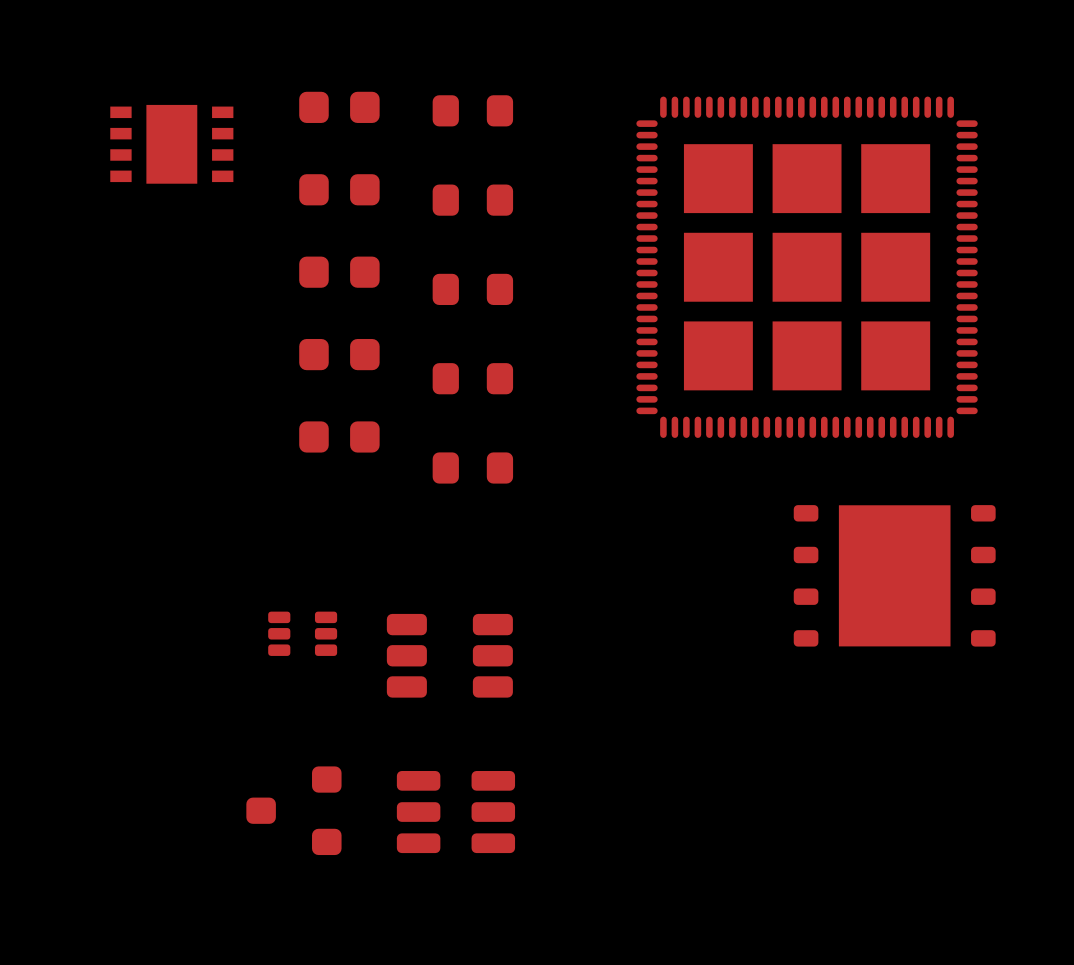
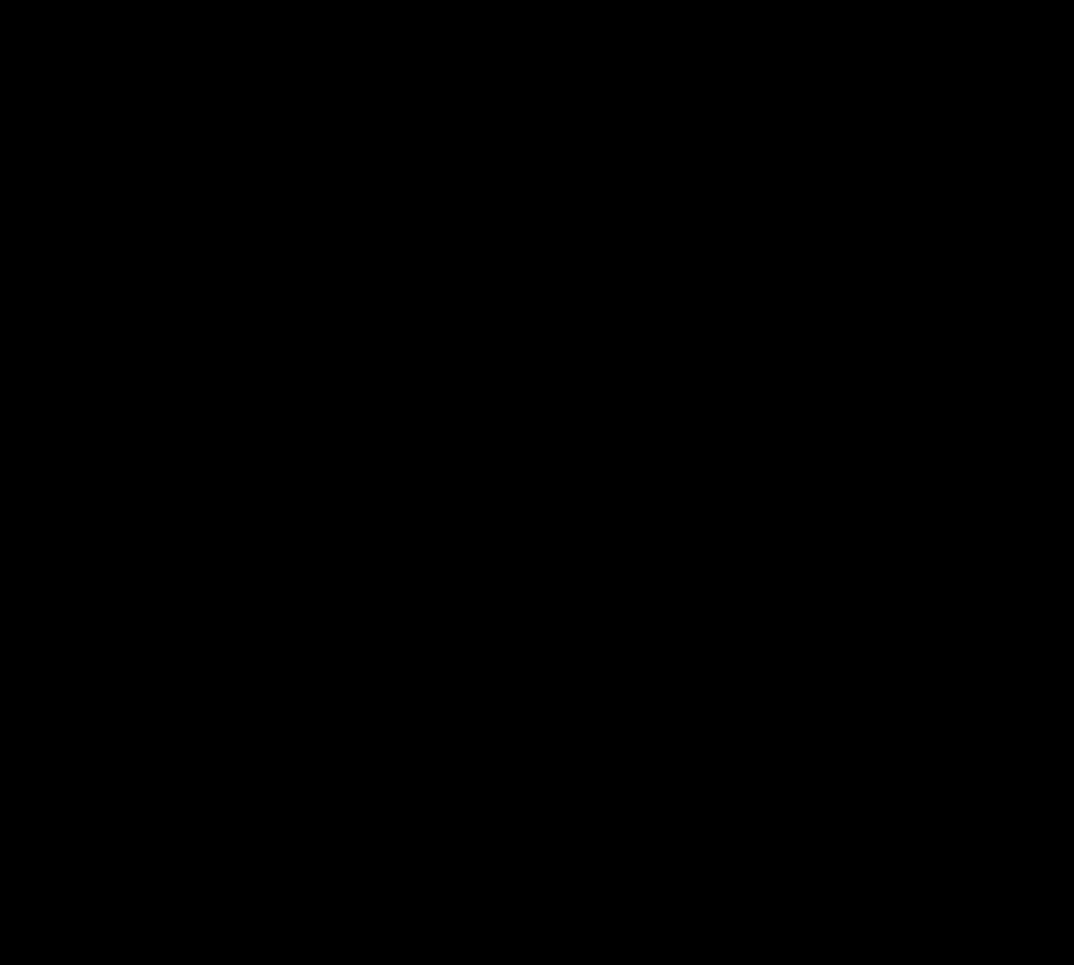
part: (339, 107) -> none
part: (472, 110) -> none
part: (171, 144) -> none
part: (339, 189) -> none
part: (472, 200) -> none
part: (807, 267) -> none
part: (339, 272) -> none
part: (472, 289) -> none
part: (339, 354) -> none
part: (472, 378) -> none
part: (339, 436) -> none
part: (472, 468) -> none
part: (894, 575) -> none
part: (302, 633) -> none
part: (449, 655) -> none
part: (293, 810) -> none
part: (455, 812) -> none

